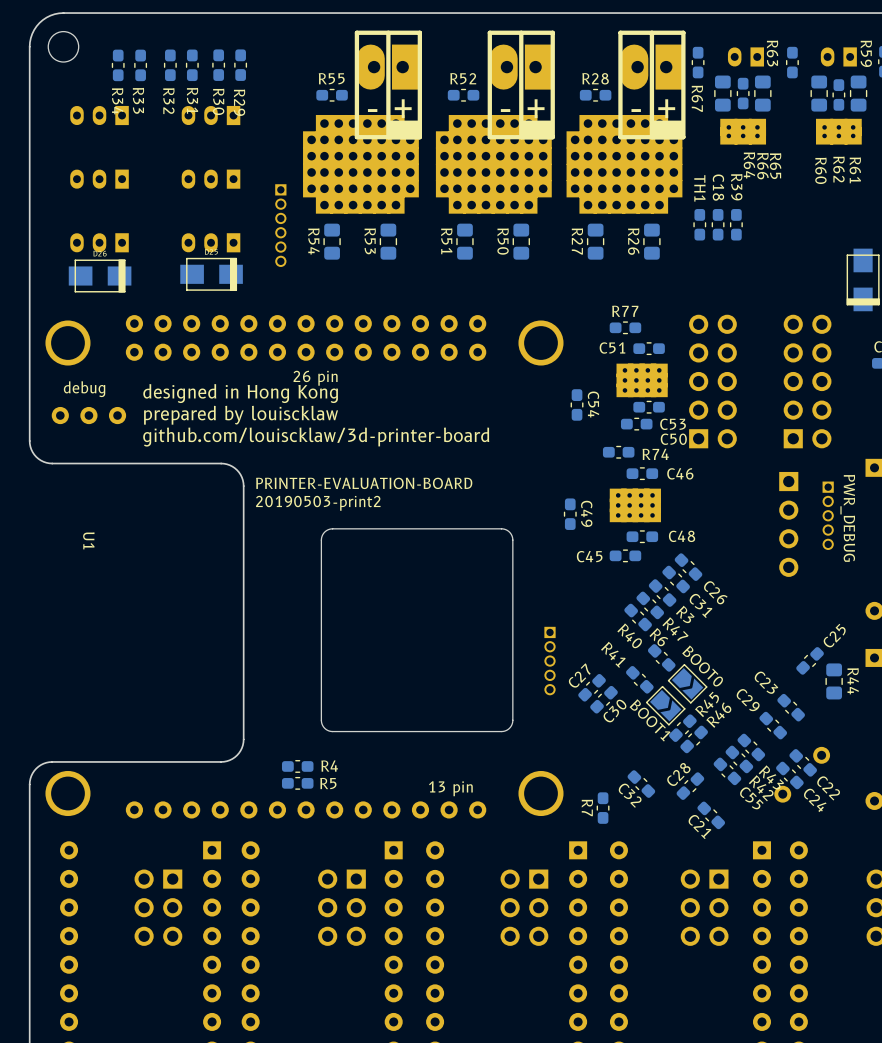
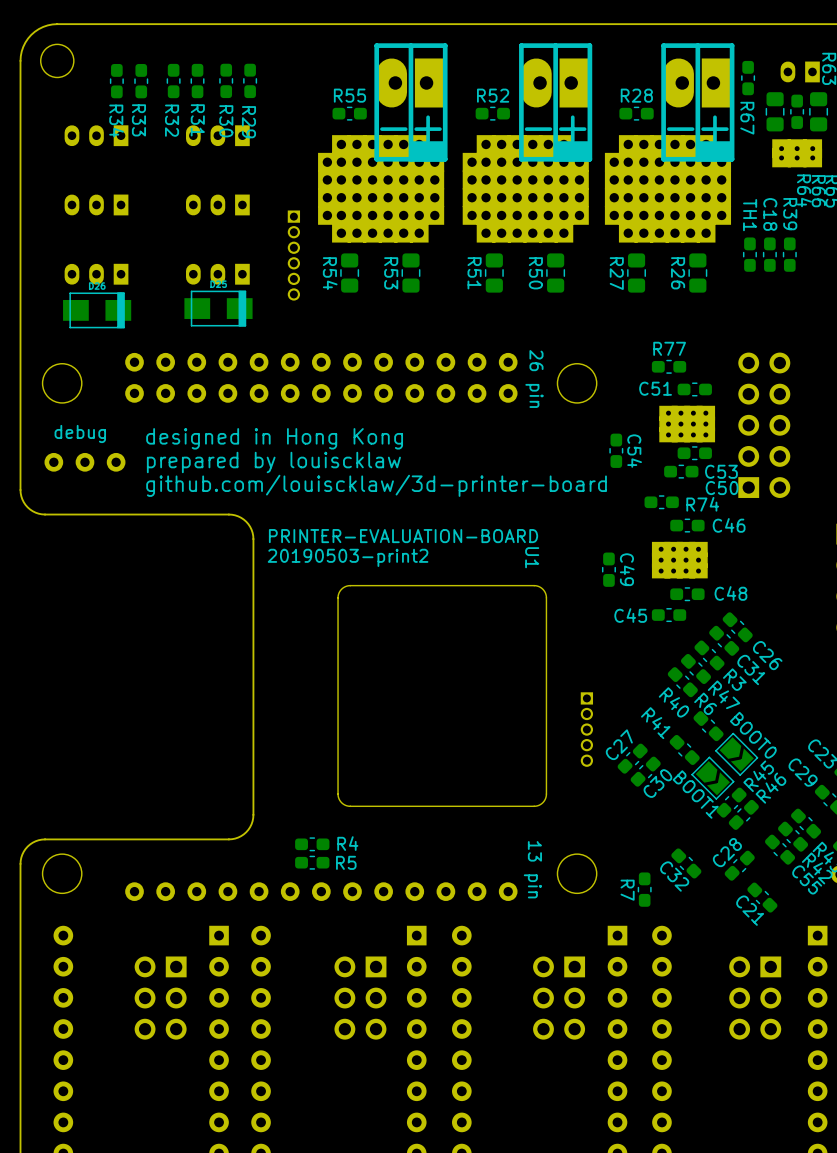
U1 footprint: [45, 315, 564, 819] -> [42, 352, 597, 901]
U1 name position: U1 (88, 540) -> U1 (532, 557)

